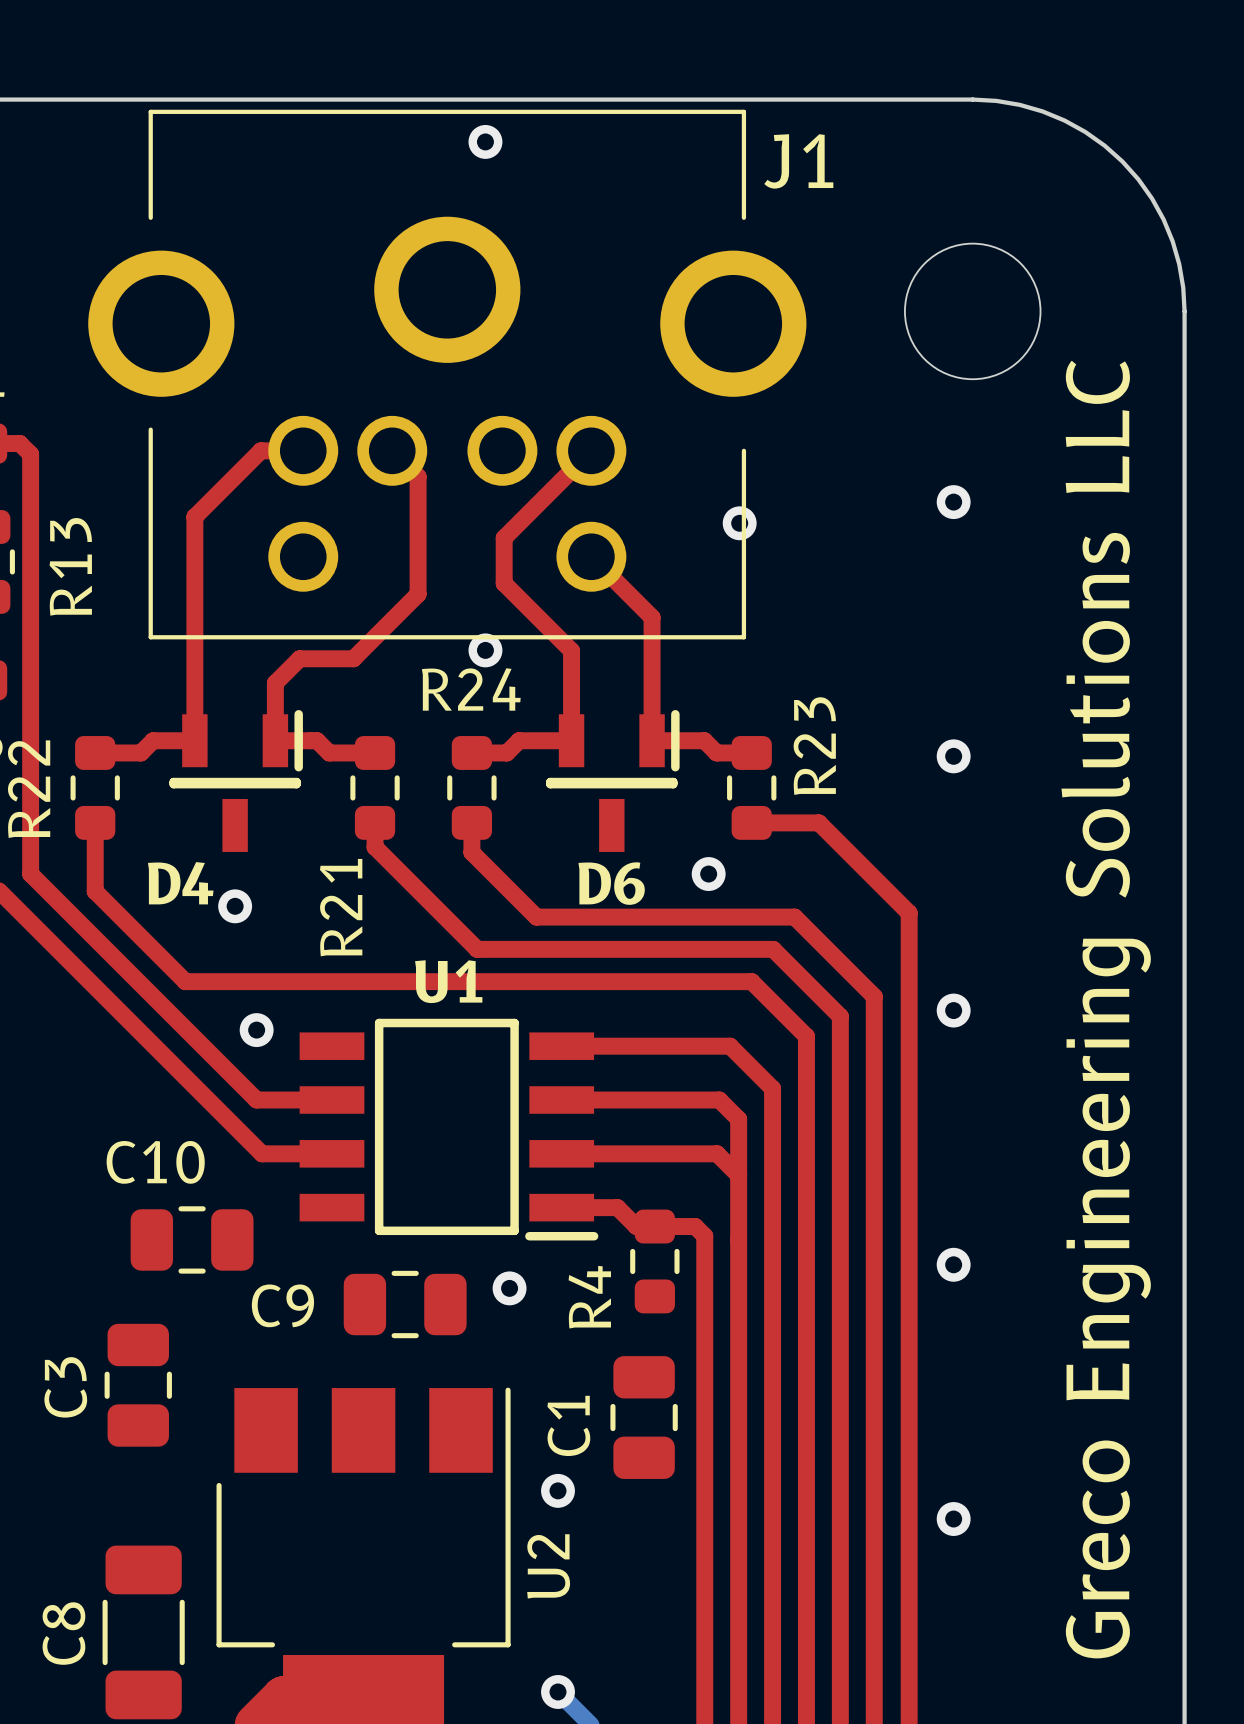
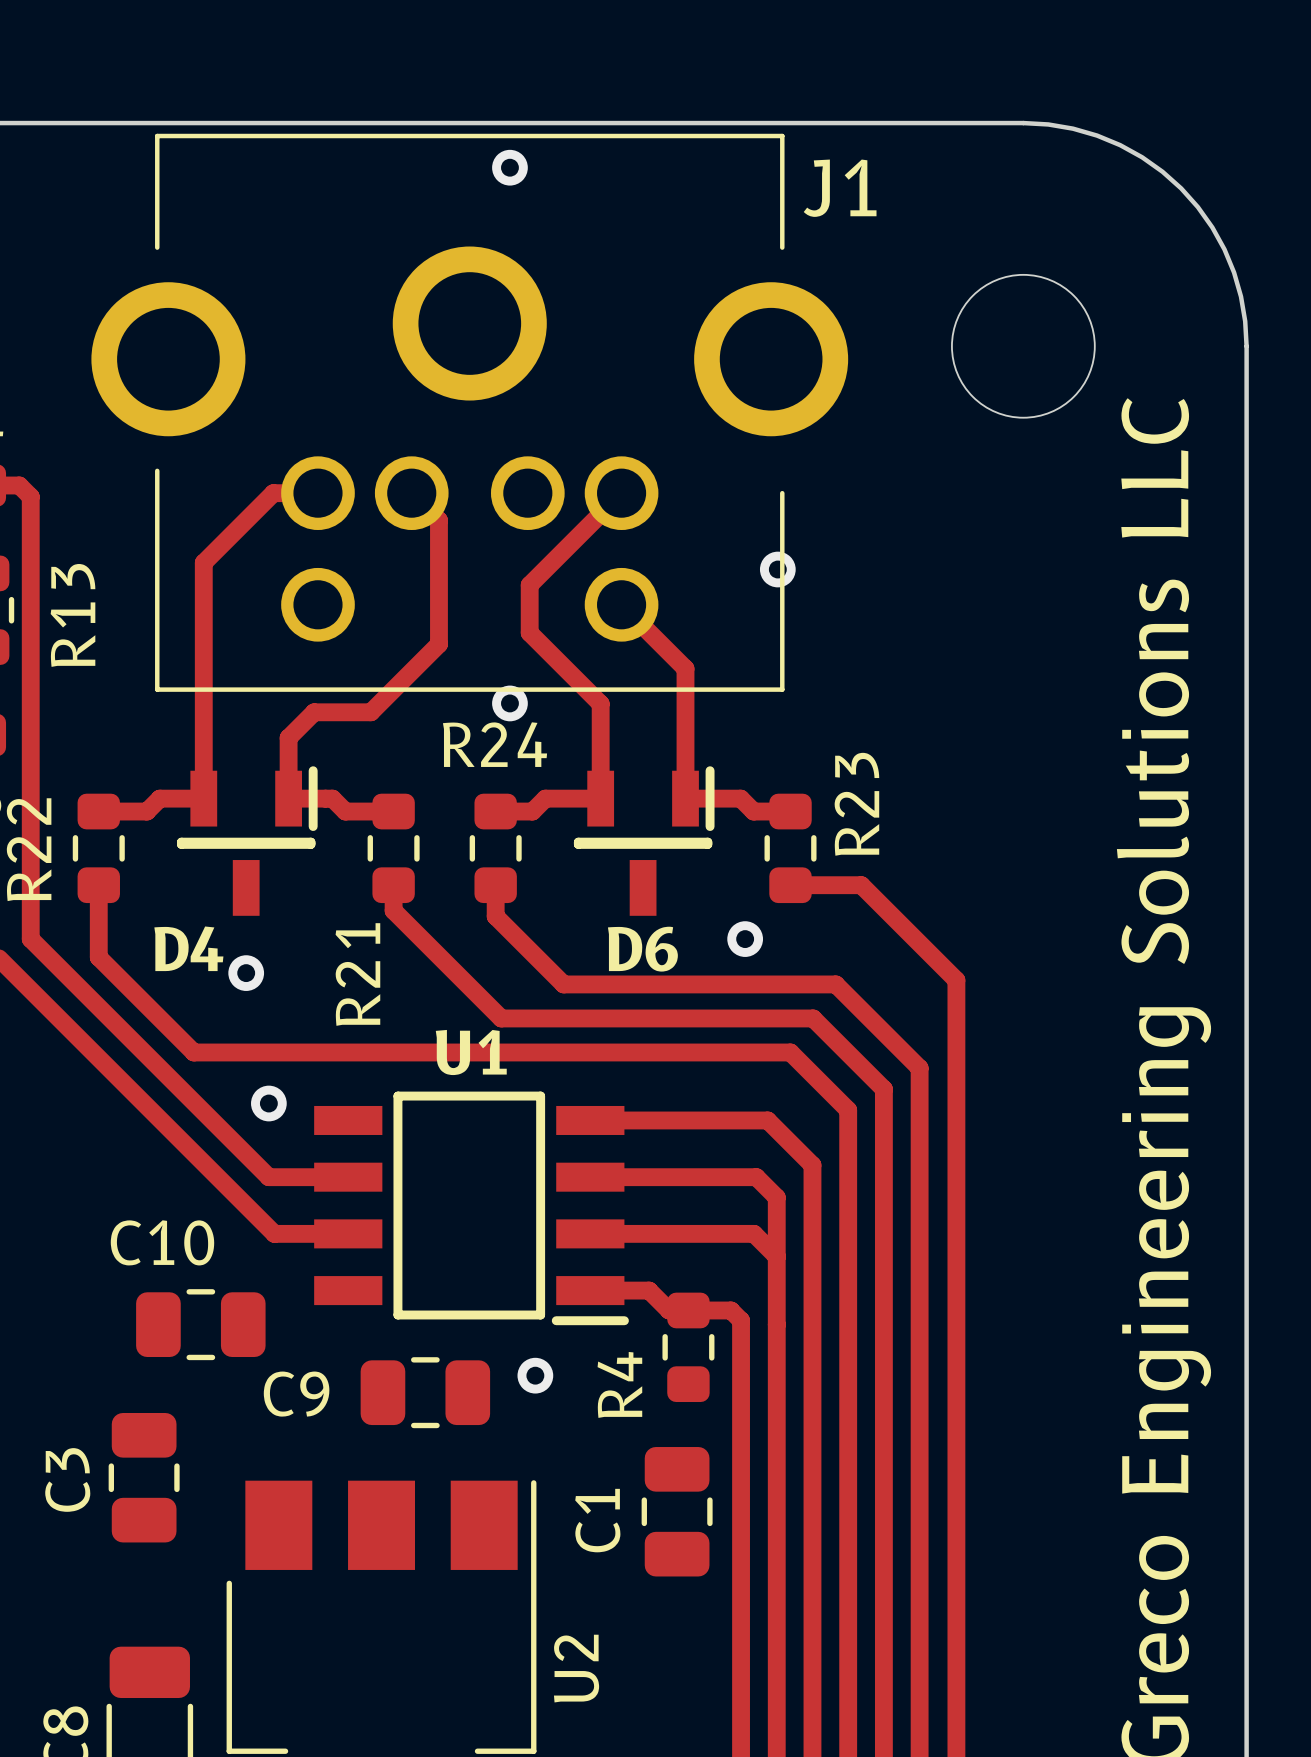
via: (953, 502) -> none
via: (953, 756) -> none
via: (953, 1010) -> none
via: (953, 1264) -> none
via: (558, 1490) -> none
via: (953, 1519) -> none

